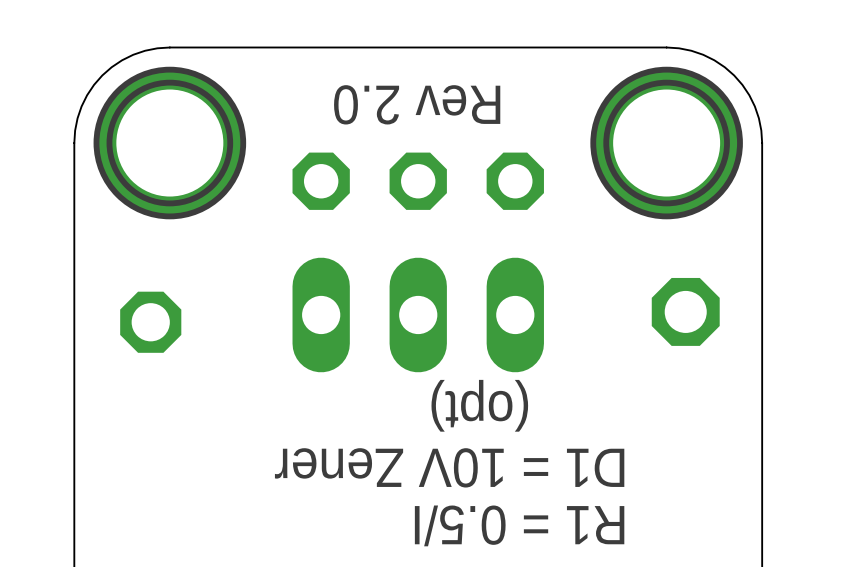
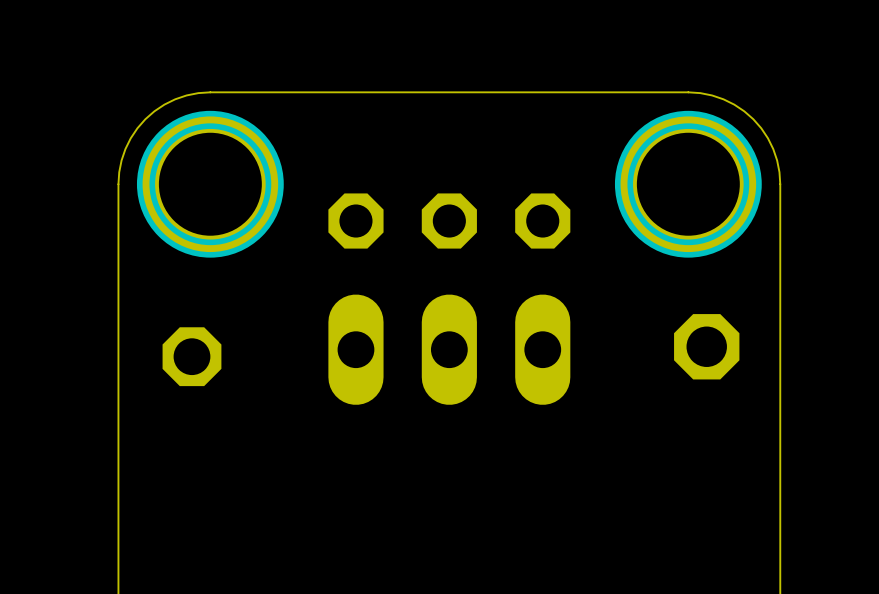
text: Rev 2.0 (417, 104) -> none
text: (opt) (479, 405) -> none
text: D1 = 10V Zener (449, 467) -> none
text: R1 = 0.5/I (519, 525) -> none

